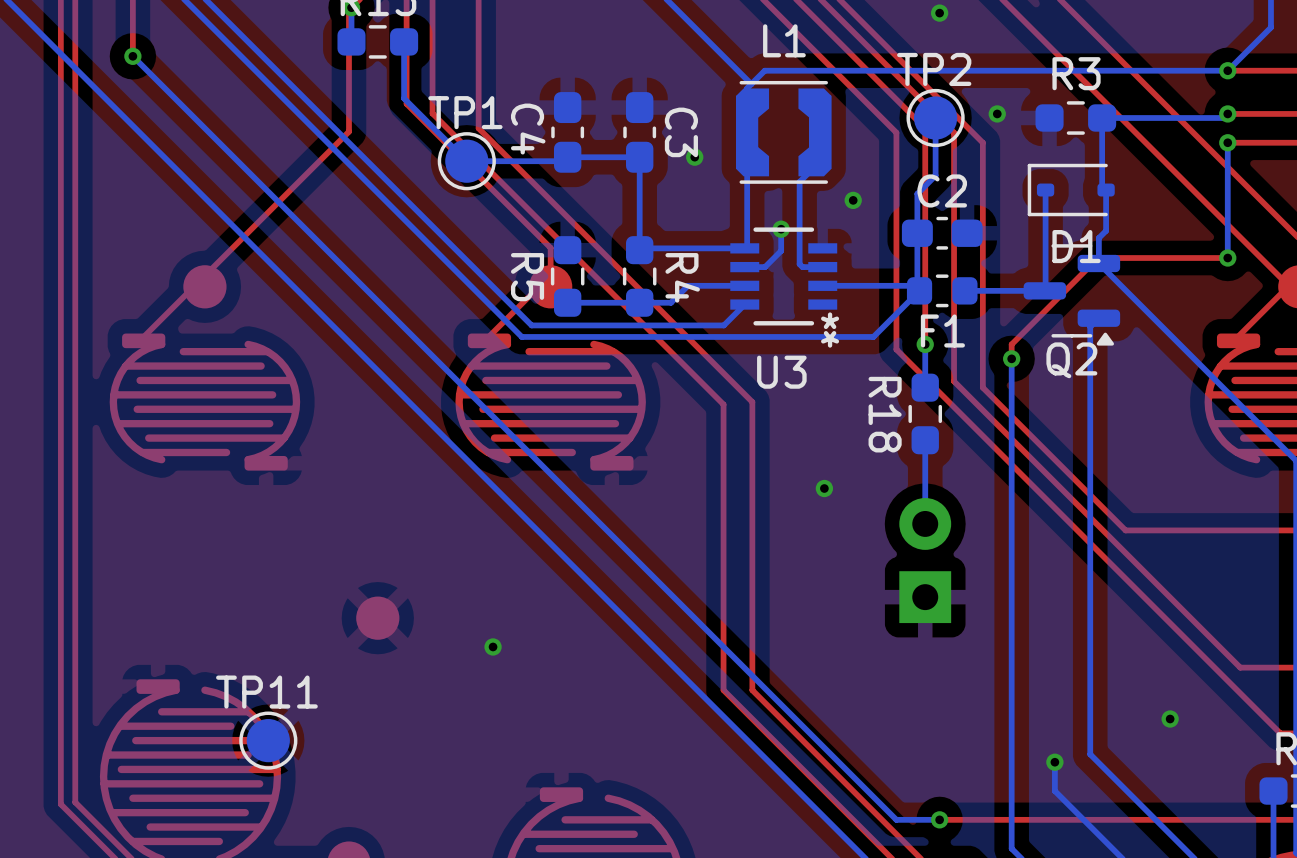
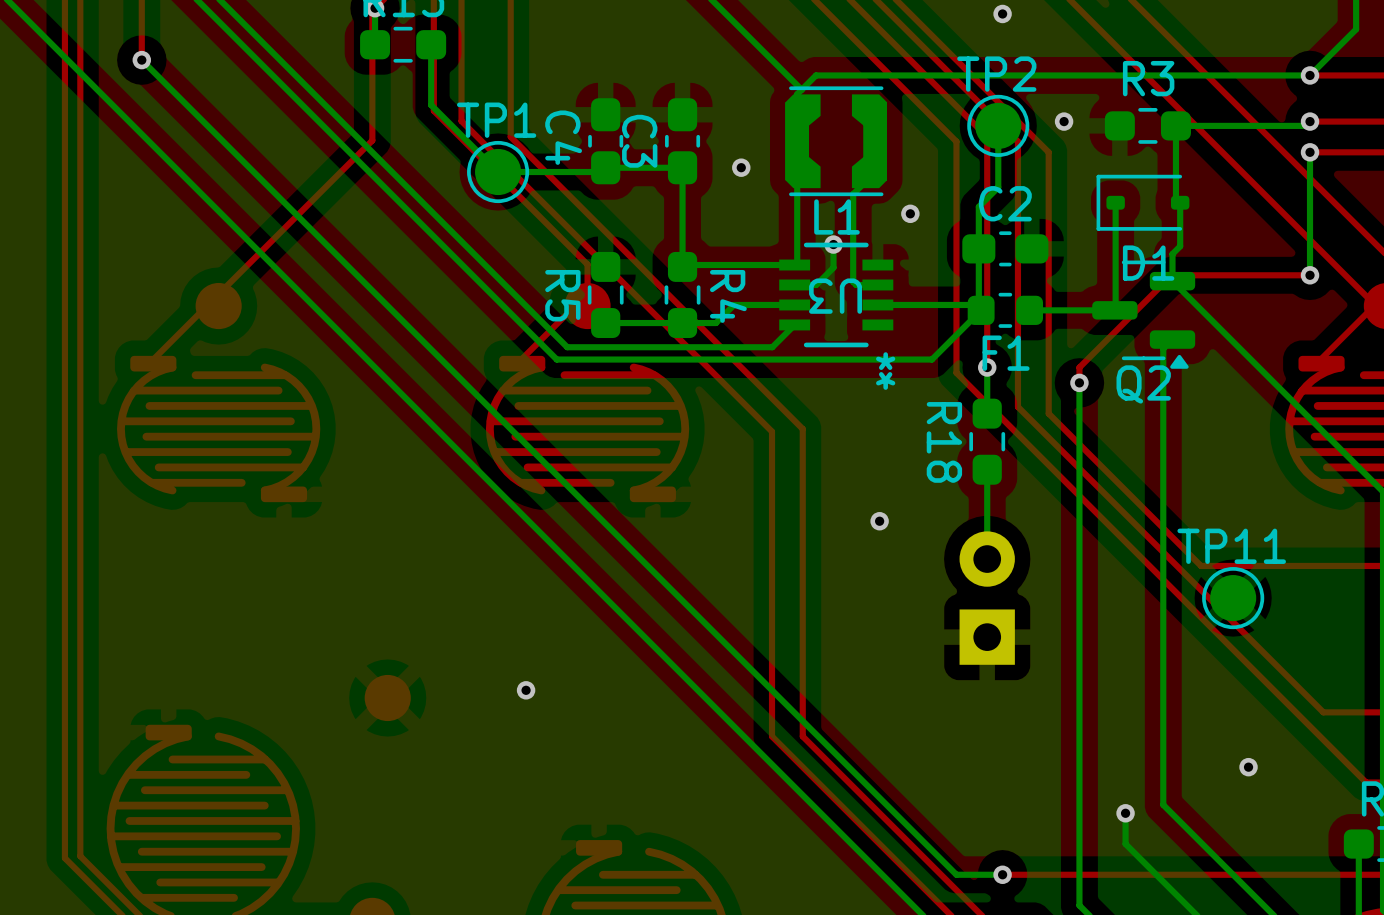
L1 name position: L1 (784, 40) -> L1 (836, 216)
C3 name position: C3 (681, 132) -> C3 (639, 141)
U3 footprint: [730, 227, 838, 326] -> [779, 242, 894, 348]
U3 name position: U3 (781, 372) -> U3 (835, 296)
part position: (377, 618) -> (387, 698)
TP11 position: (268, 740) -> (1233, 598)

